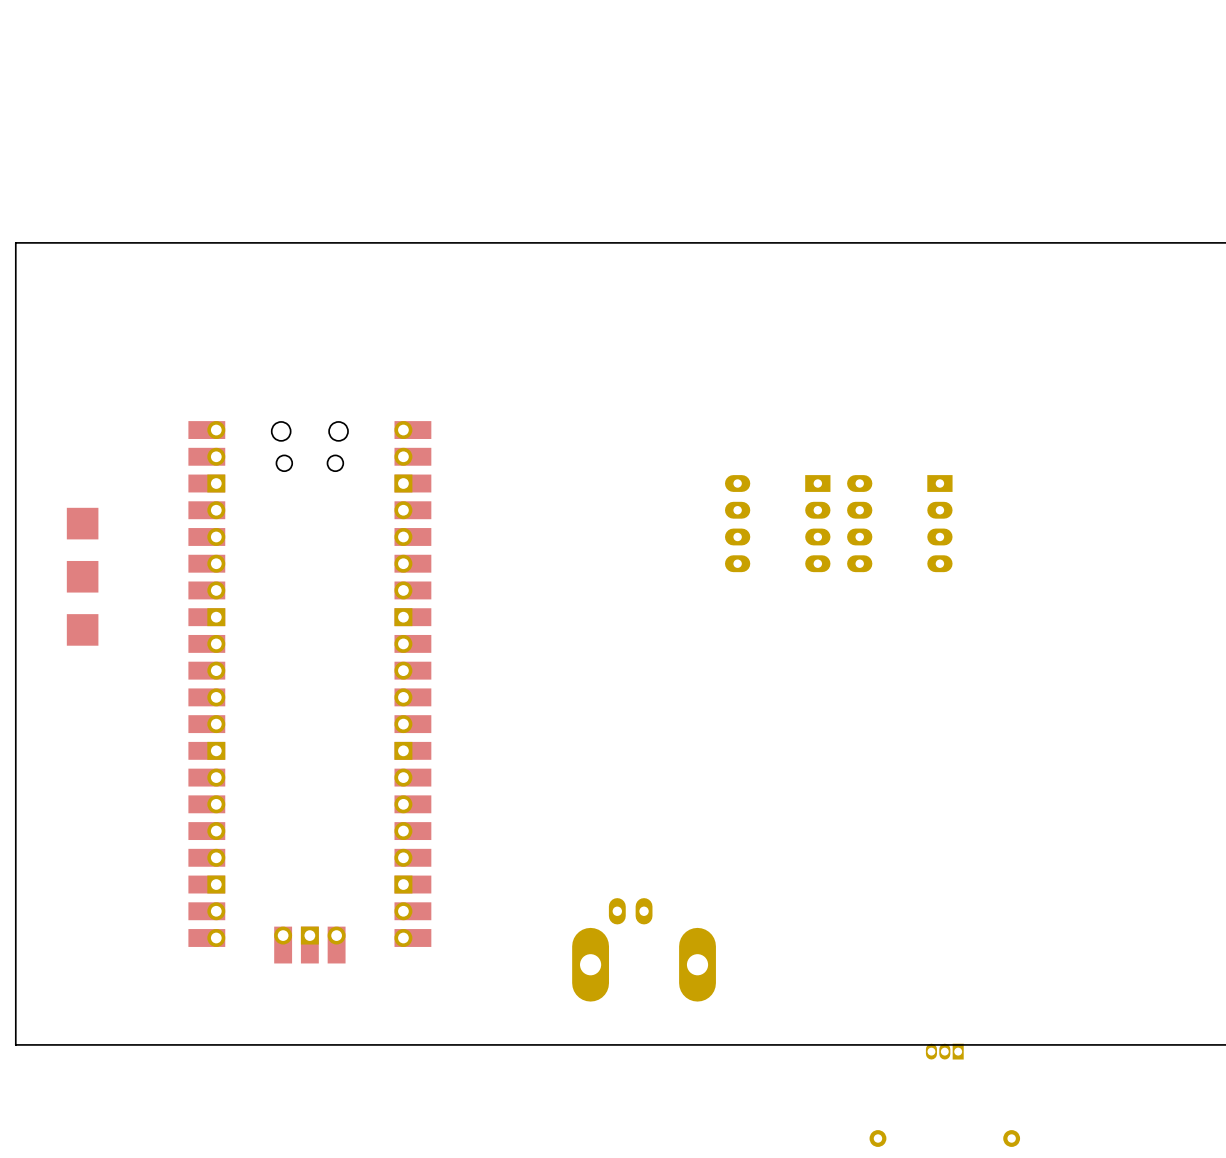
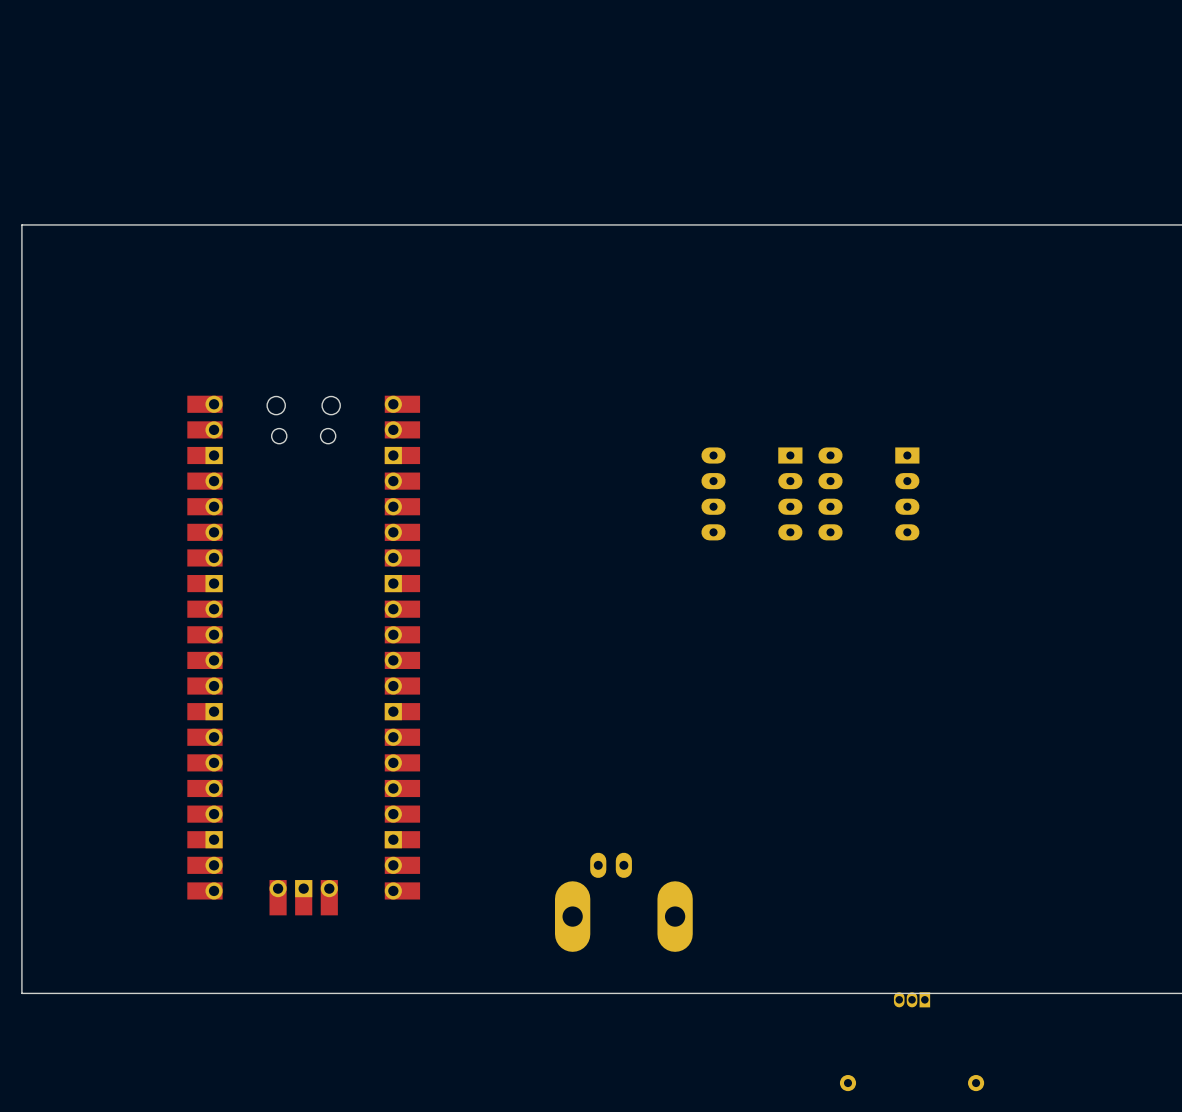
part: (82, 523) -> none
part: (82, 576) -> none
part: (82, 629) -> none

